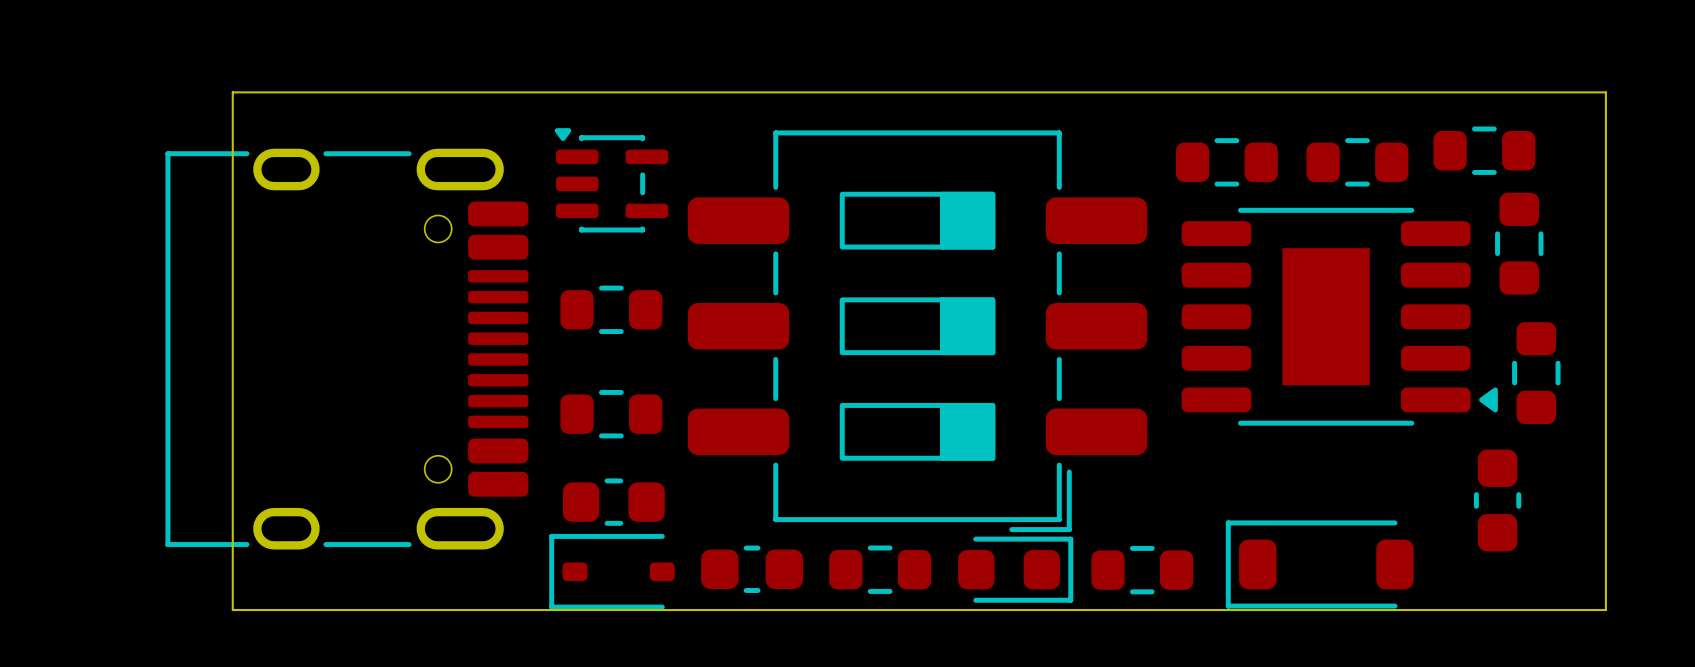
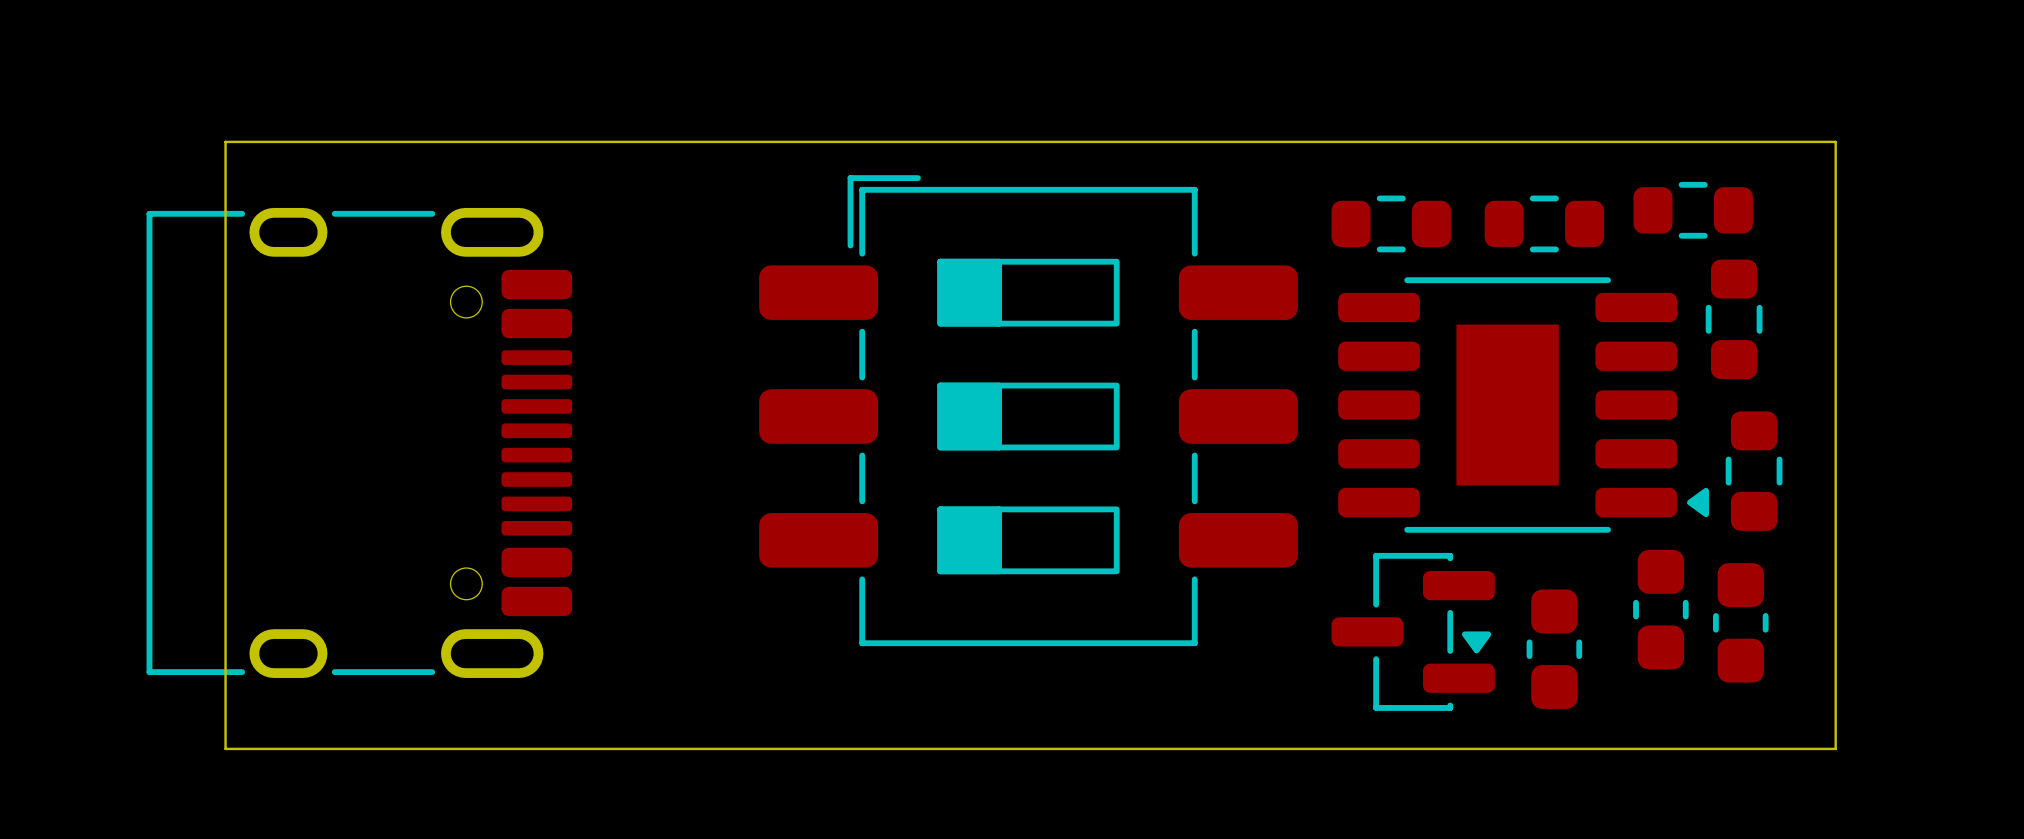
part: (611, 180) -> none
part: (611, 309) -> none
part rotation: 0° (917, 331) -> 180° (1028, 410)
part: (611, 414) -> none
part: none -> (1660, 609)
part: (1497, 500) -> none
part: (613, 502) -> none
part: none -> (1740, 622)
part: none -> (1413, 631)
part: none -> (1554, 649)
part: (1319, 564) -> none
part: (752, 569) -> none
part: (880, 569) -> none
part: (1015, 569) -> none
part: (1142, 570) -> none
part: (611, 571) -> none

